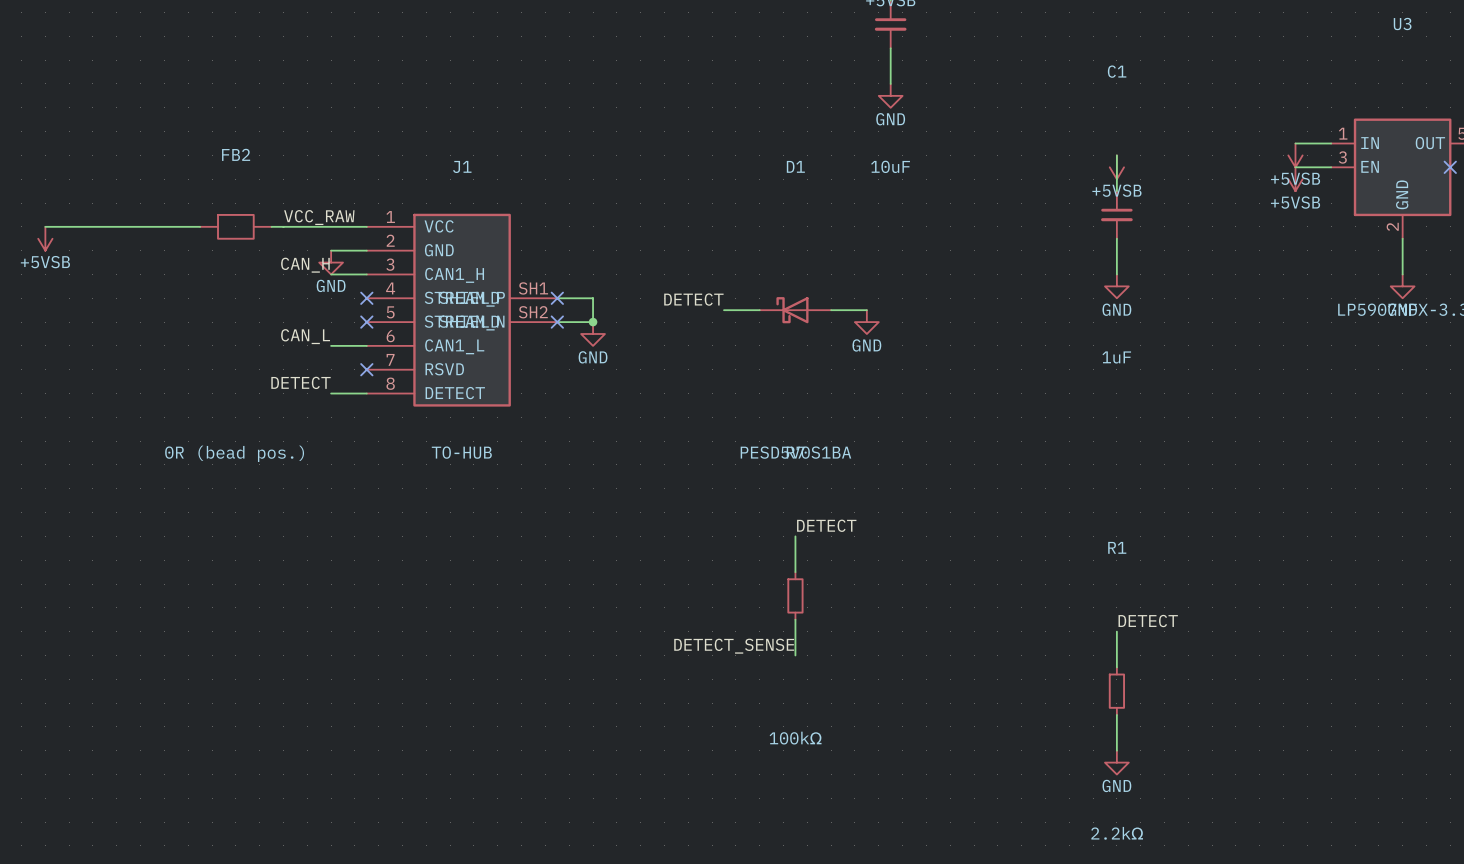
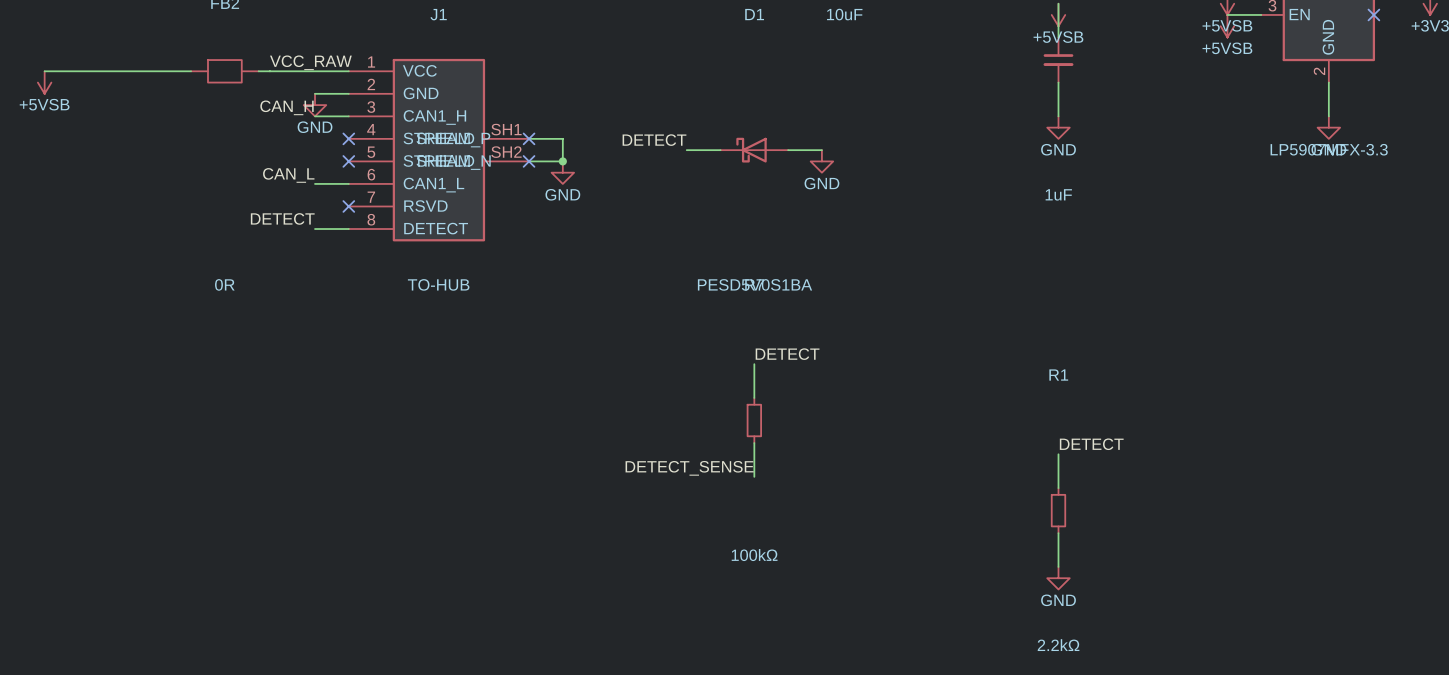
FB2 value: 0R (bead pos.) (234, 453) -> 0R (224, 284)

